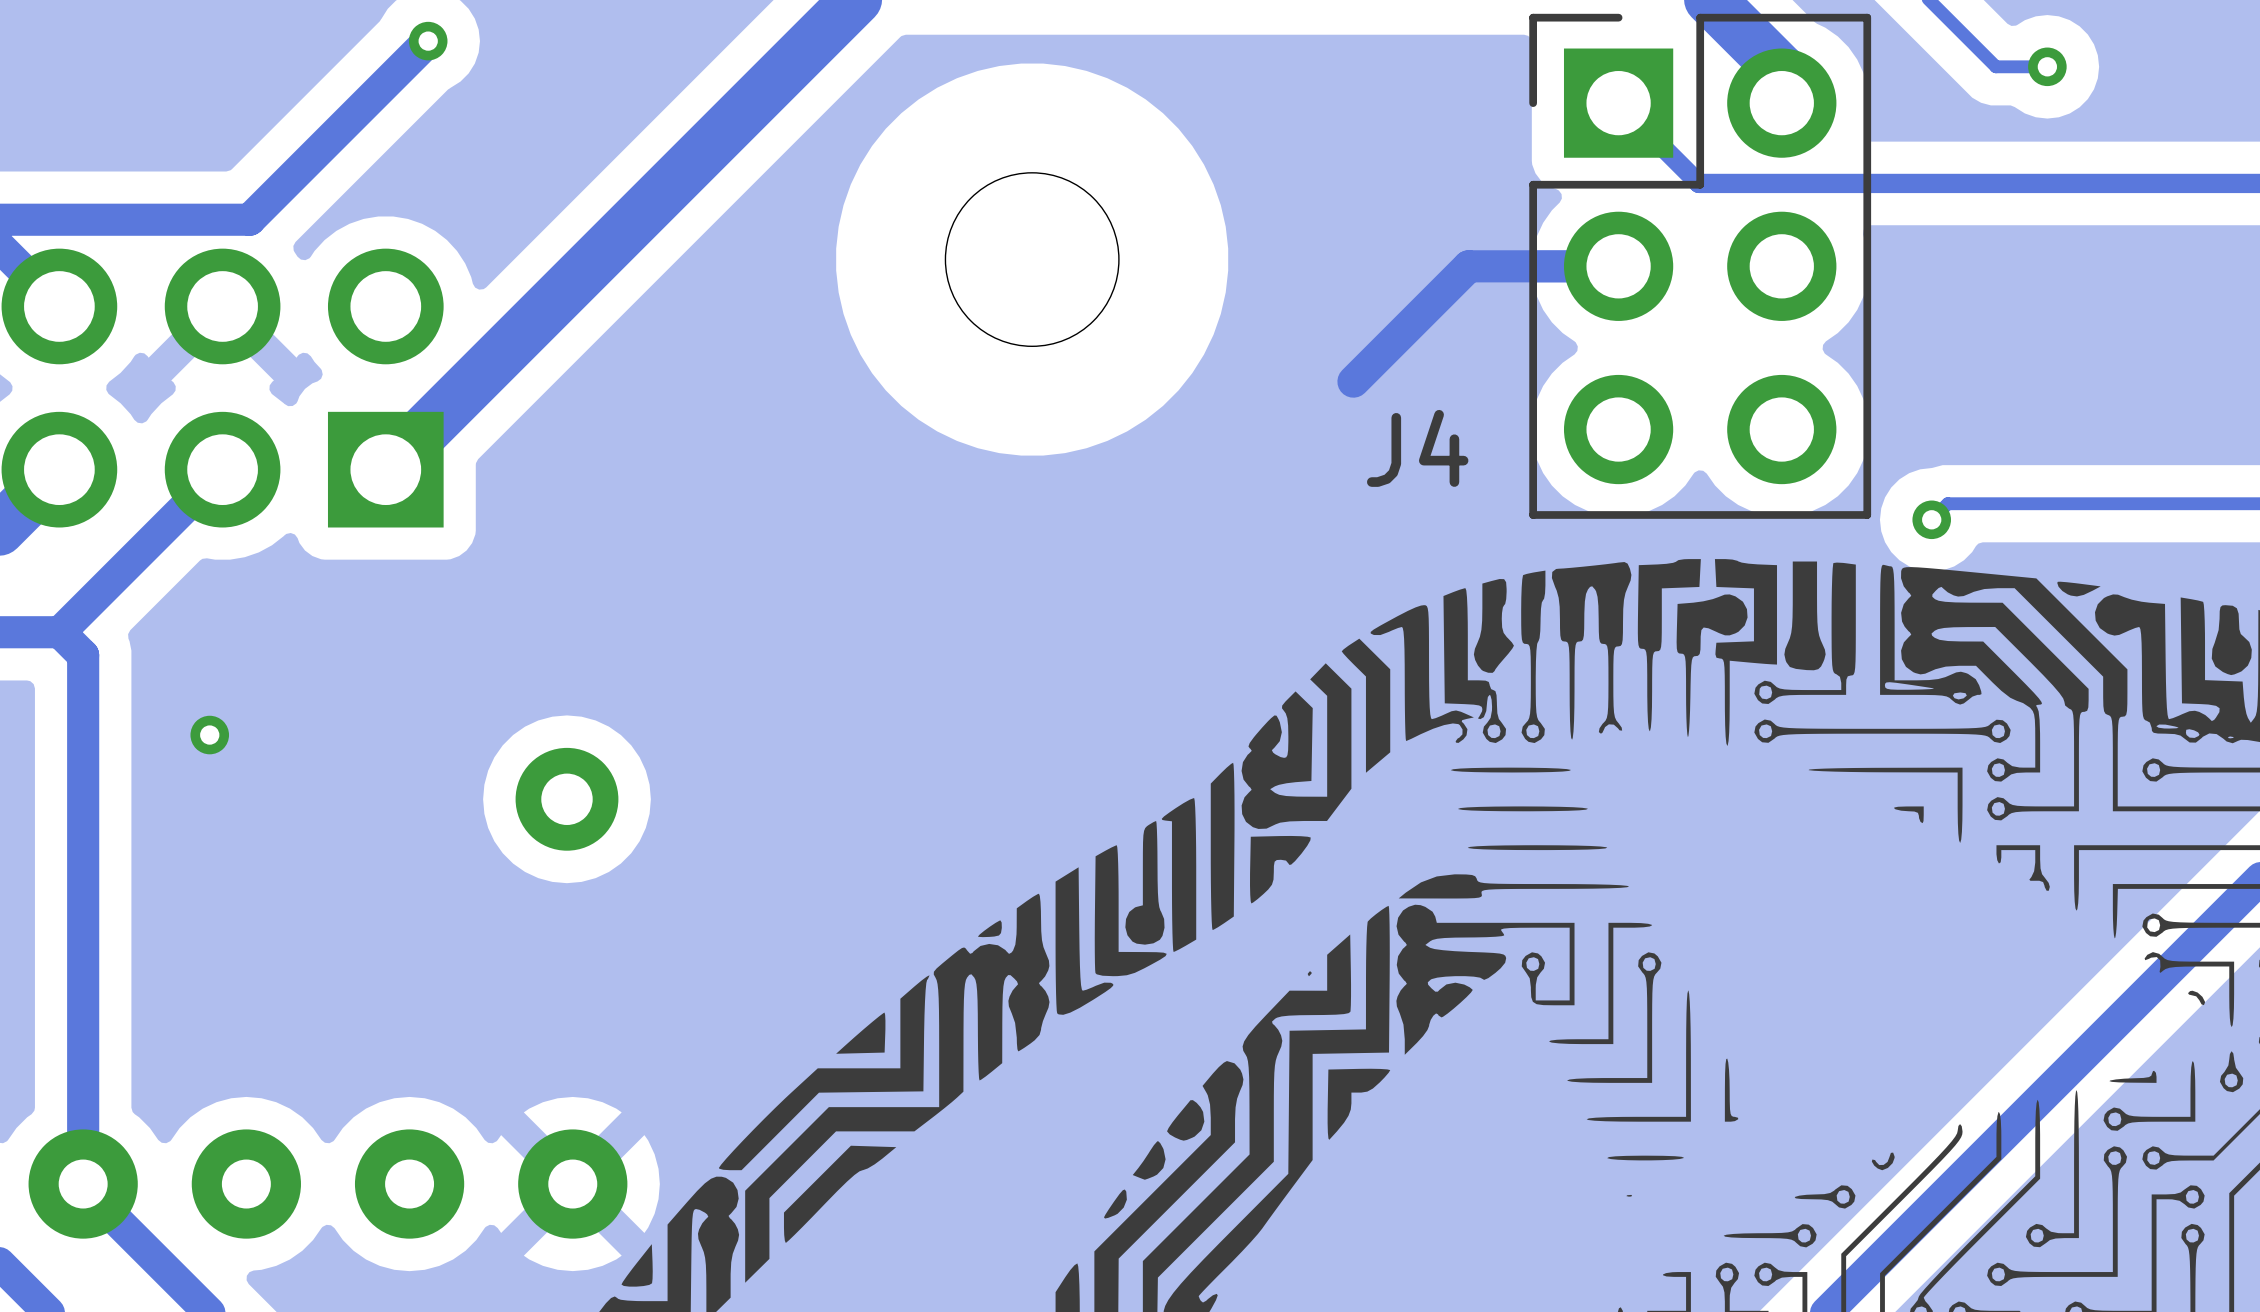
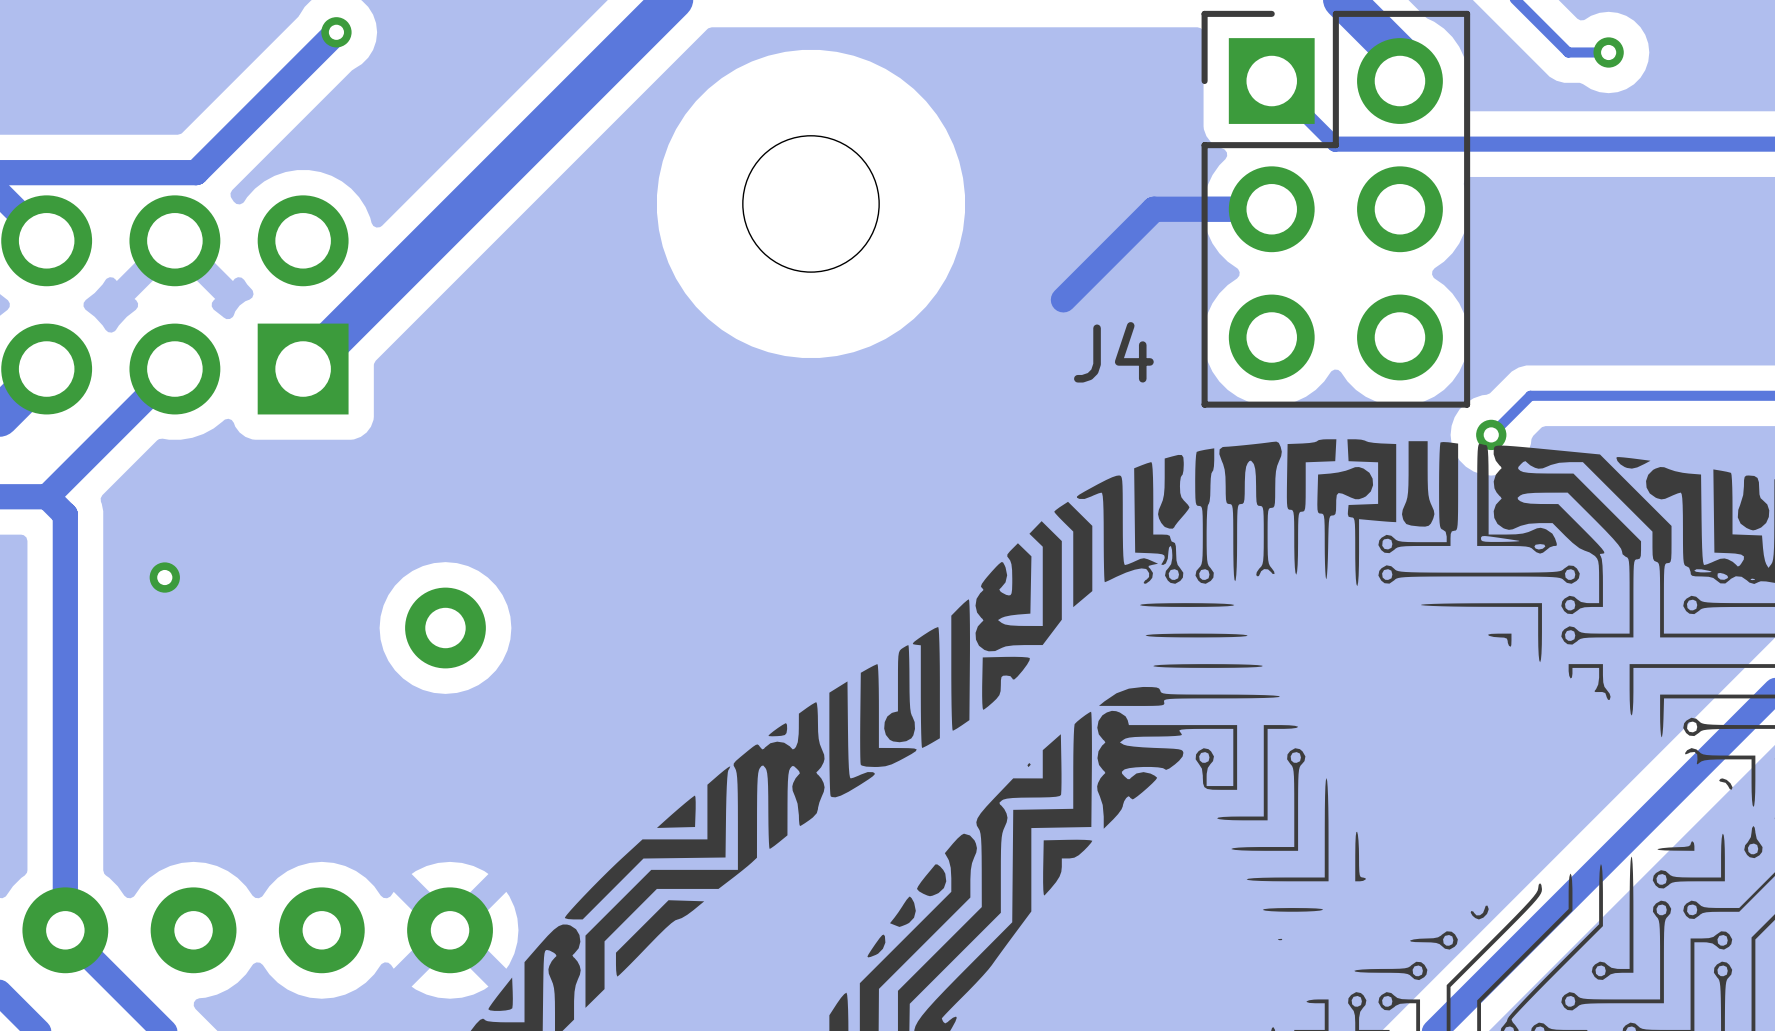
track: none -> (1517, 408) (1491, 434)
via position: (1931, 519) -> (1491, 434)

